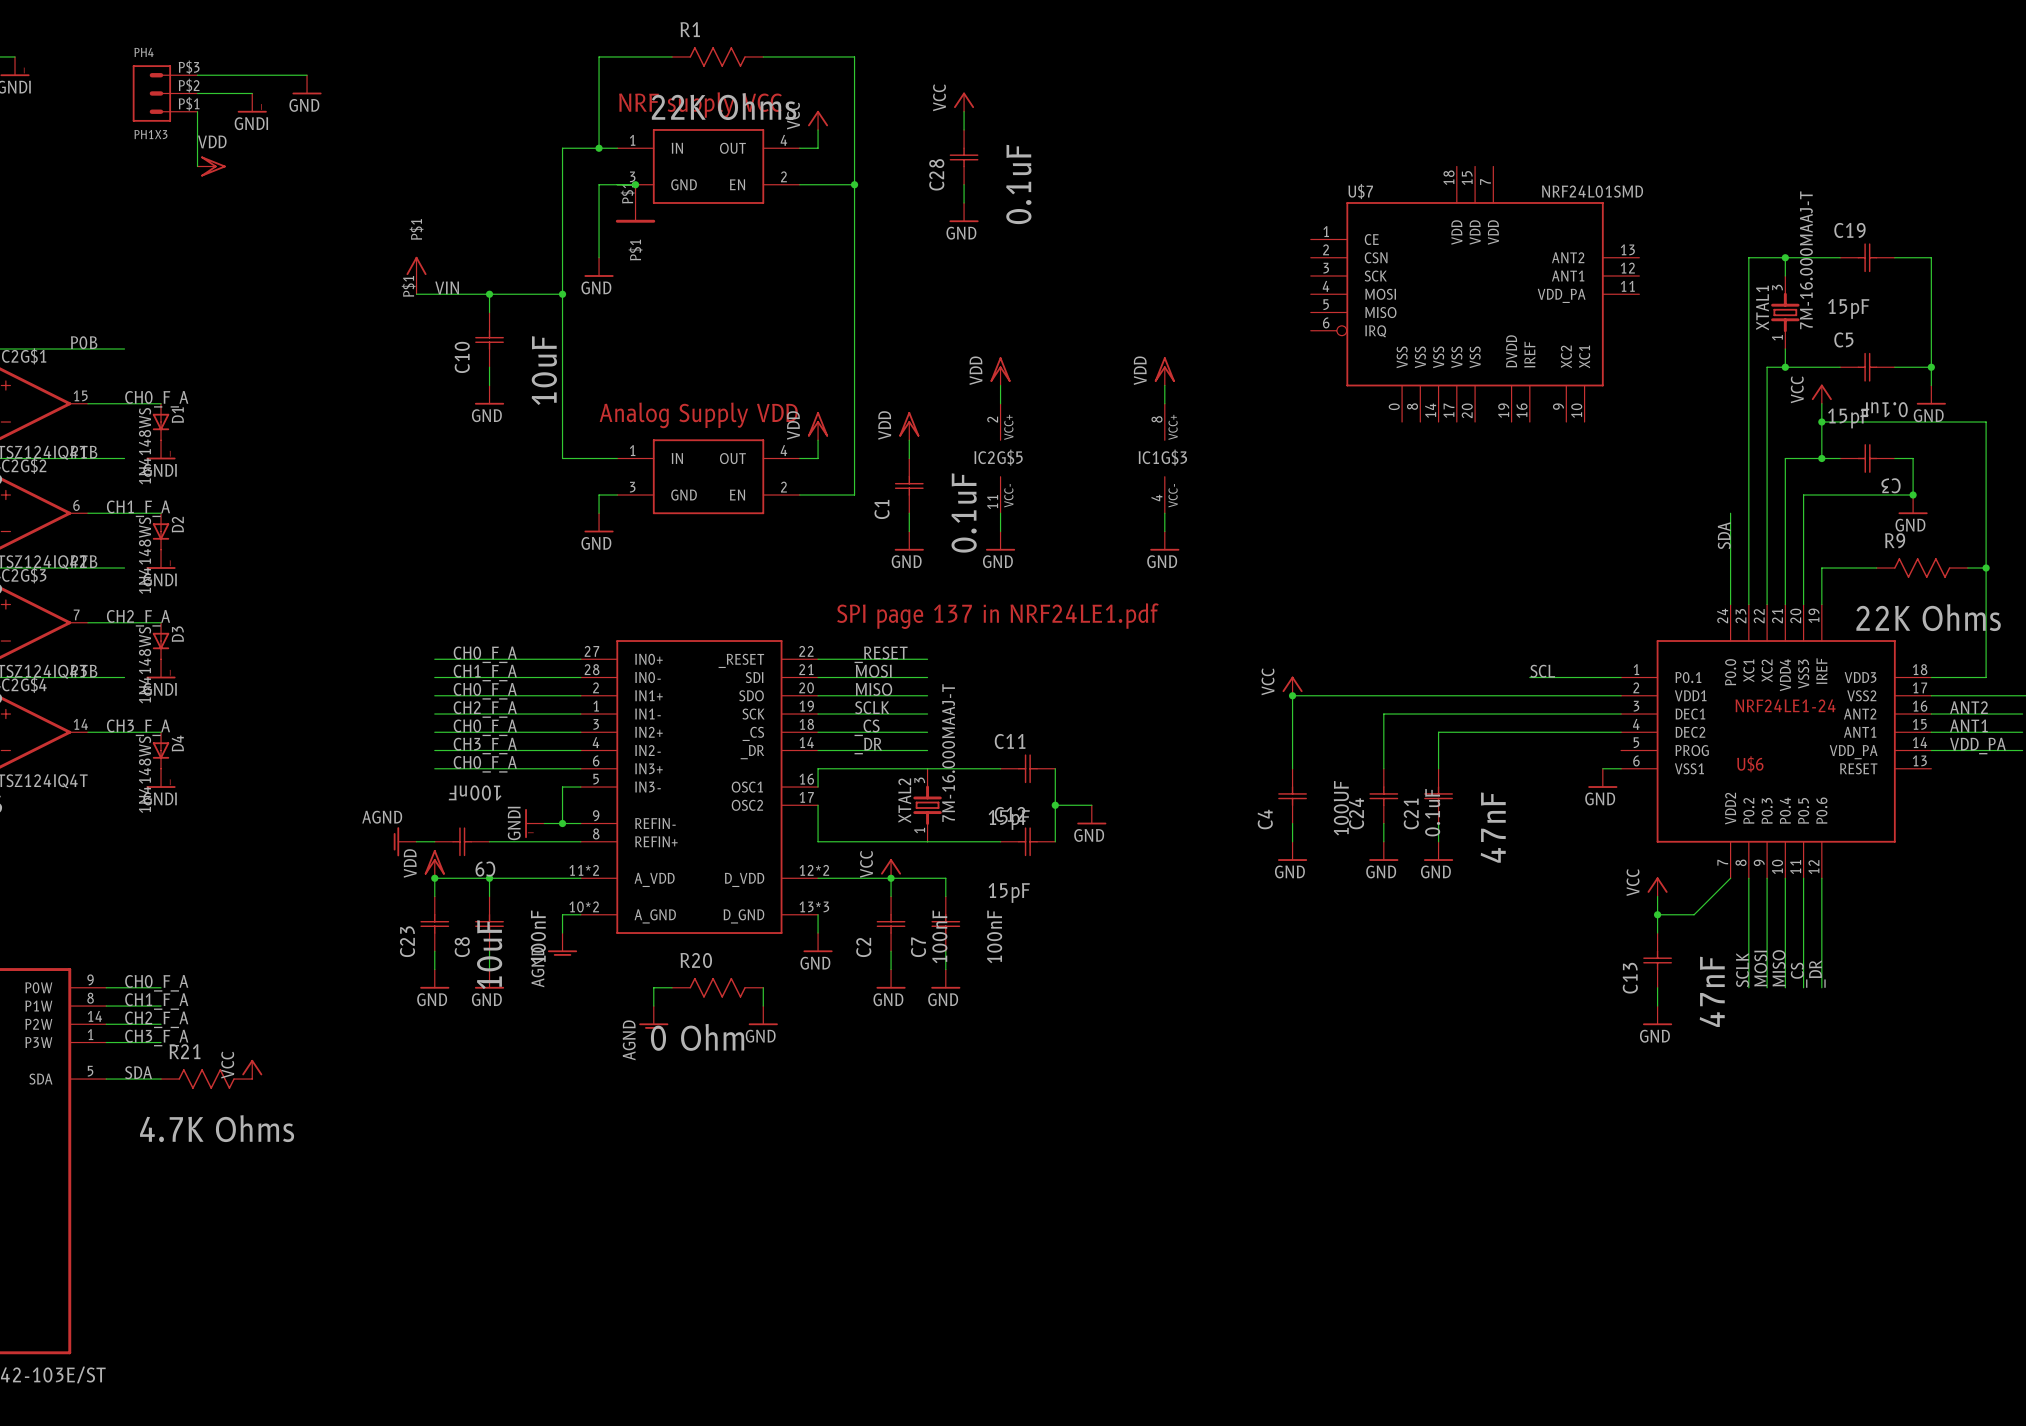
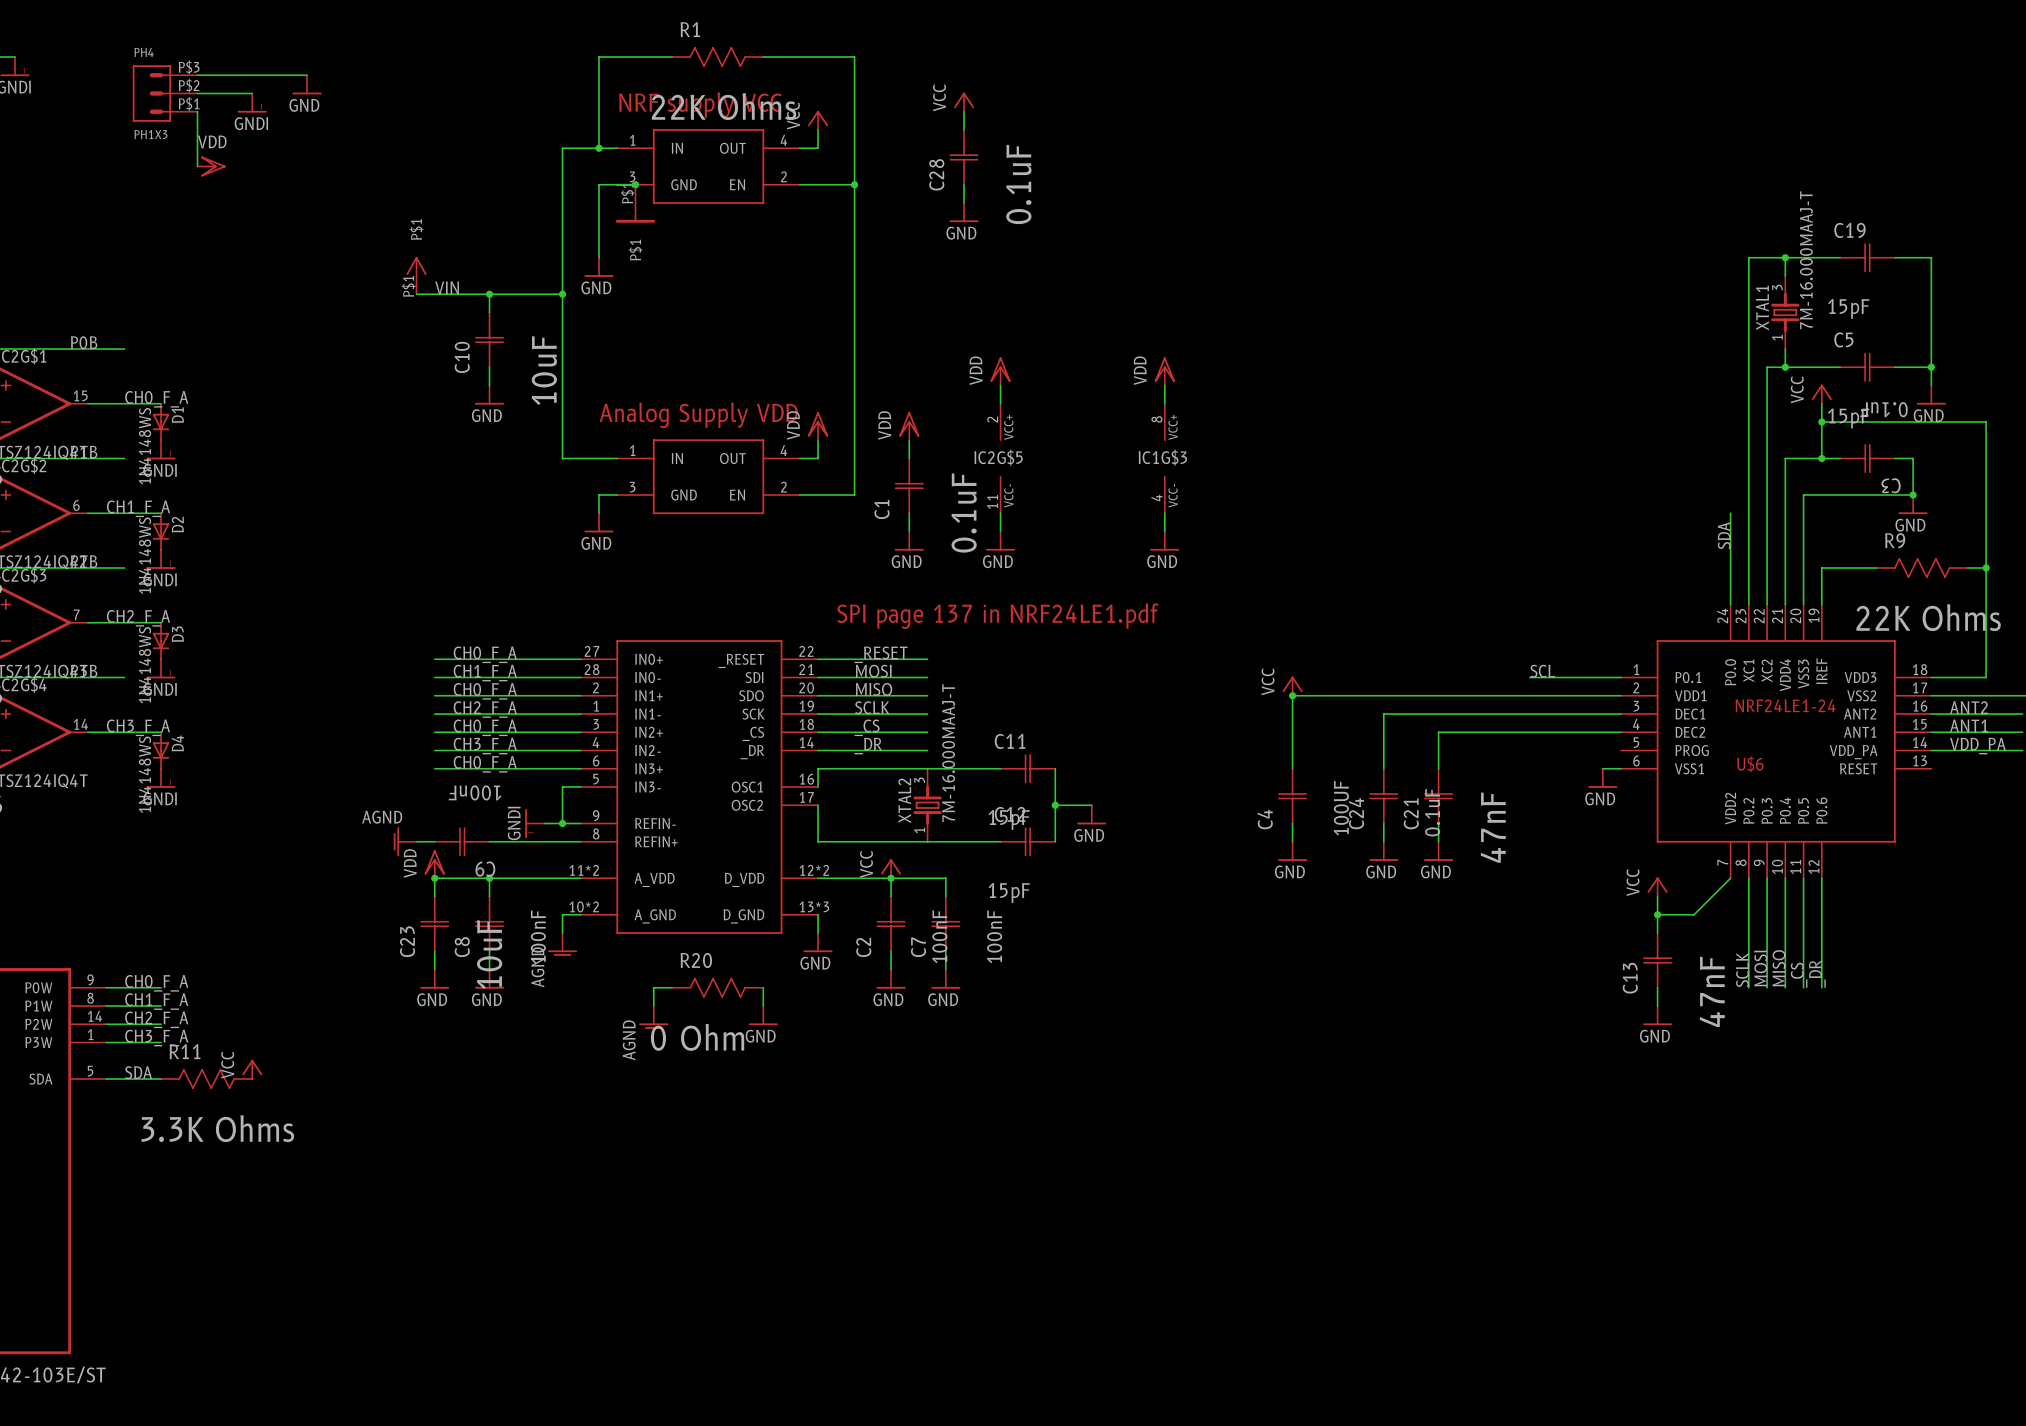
U$7: NRF24L01SMD (1475, 294) -> none
R21 name: R21 (184, 1051) -> R11 (184, 1051)
R21 value: 4.7K Ohms (217, 1128) -> 3.3K Ohms (217, 1128)

